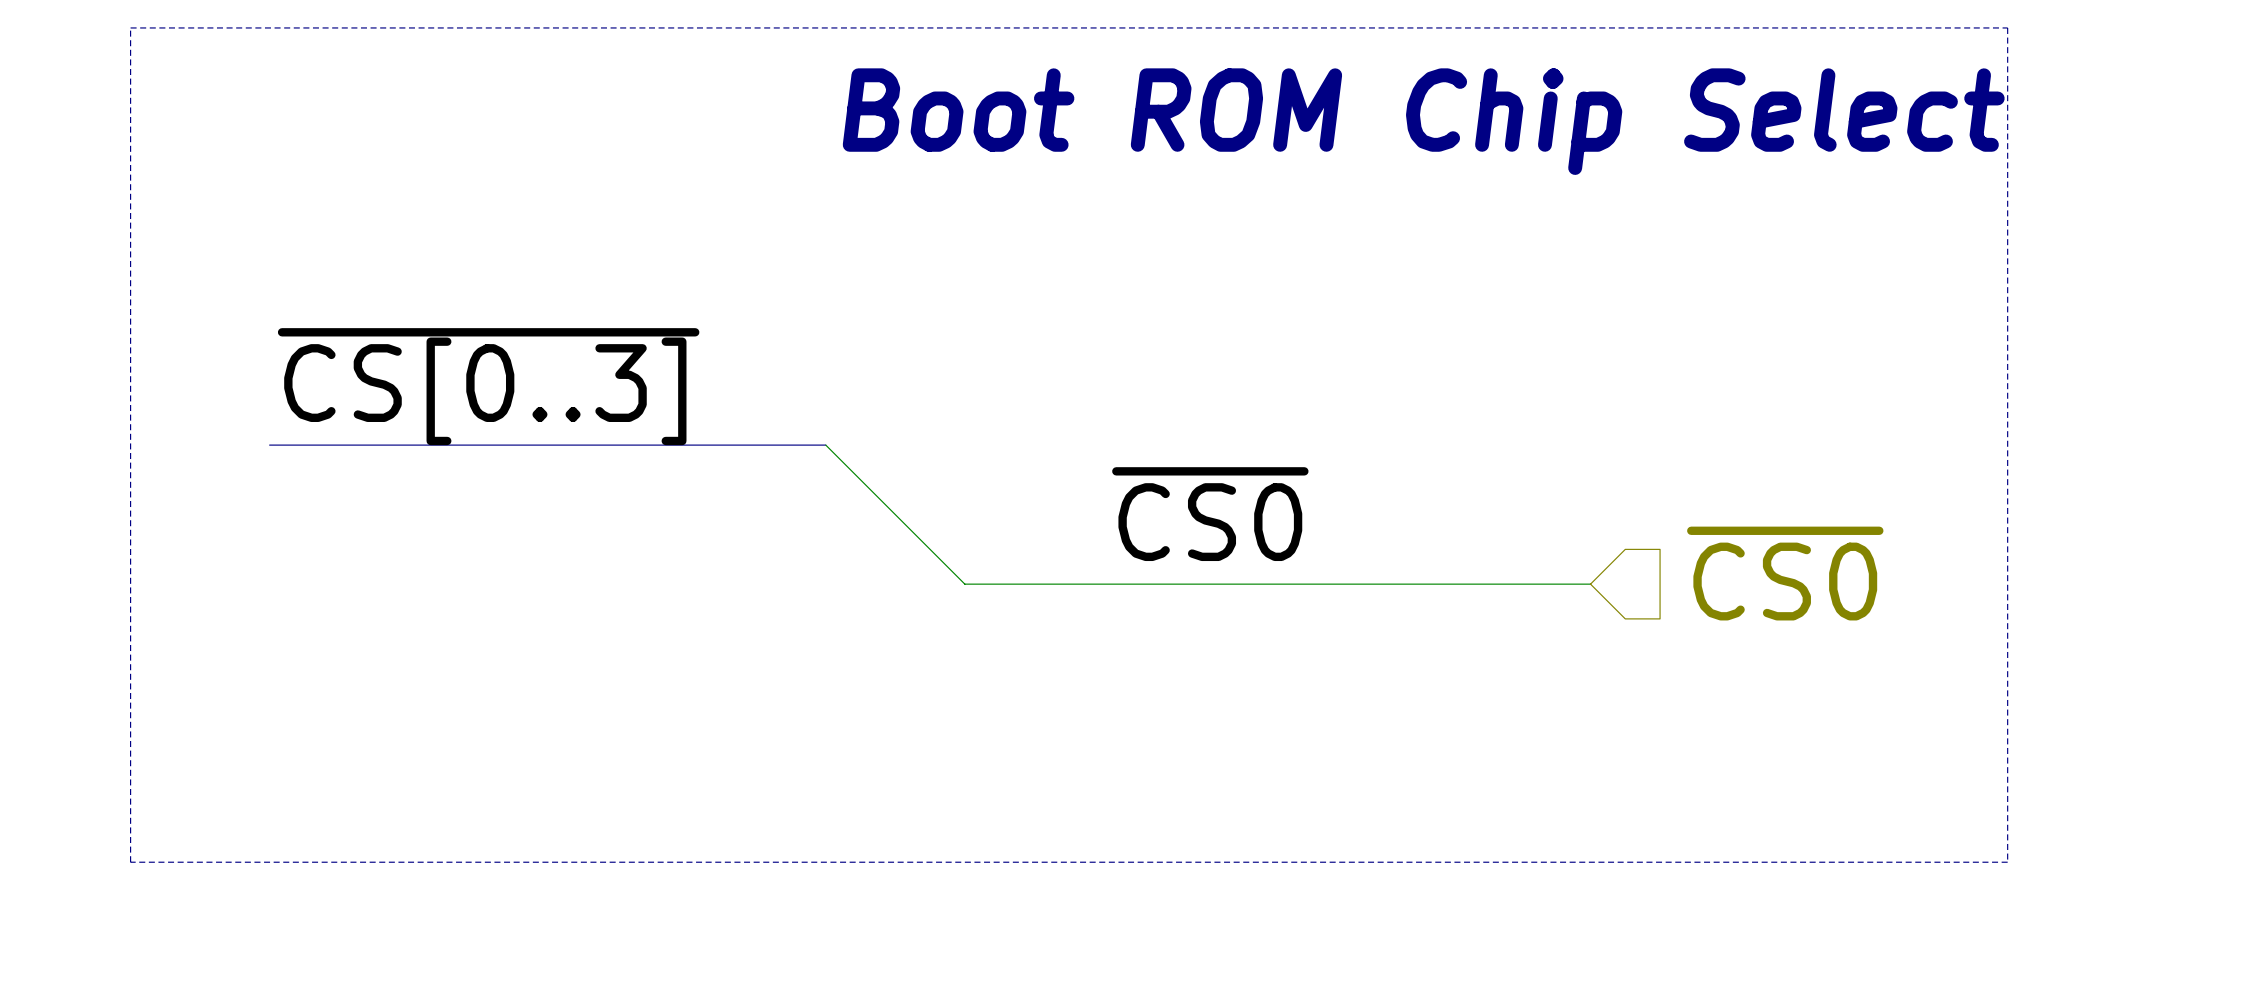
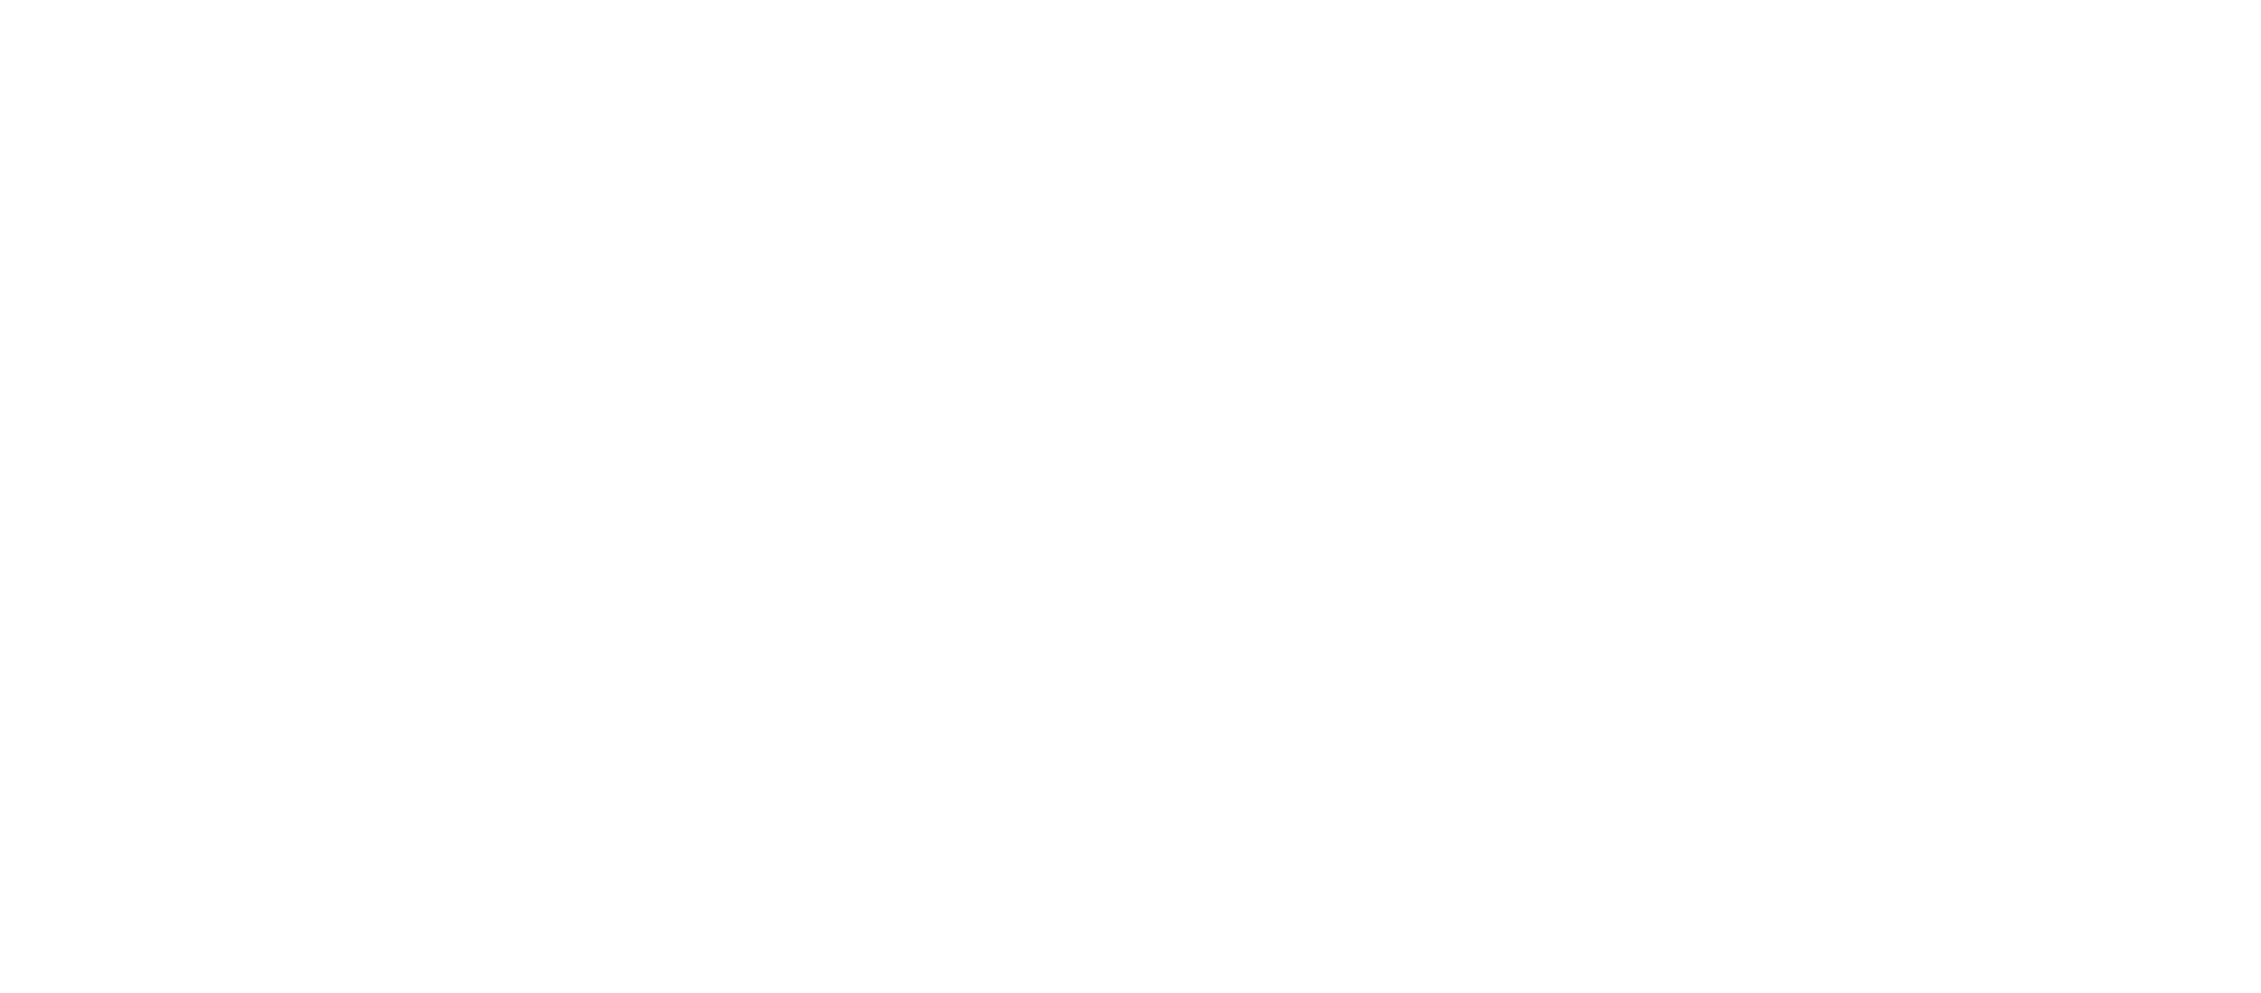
line: (130, 27) (2007, 27) (2007, 862) (130, 862) (130, 27) -> none
text: Boot ROM Chip Select (1423, 121) -> none
label: ~{CS[0..3]} (488, 386) -> none
bus: (269, 445) (825, 445) -> none
wire: (825, 445) (964, 584) (1590, 584) -> none
label: ~{CS0} (1210, 514) -> none
hierarchical label: ~{CS0} (1785, 573) -> none

